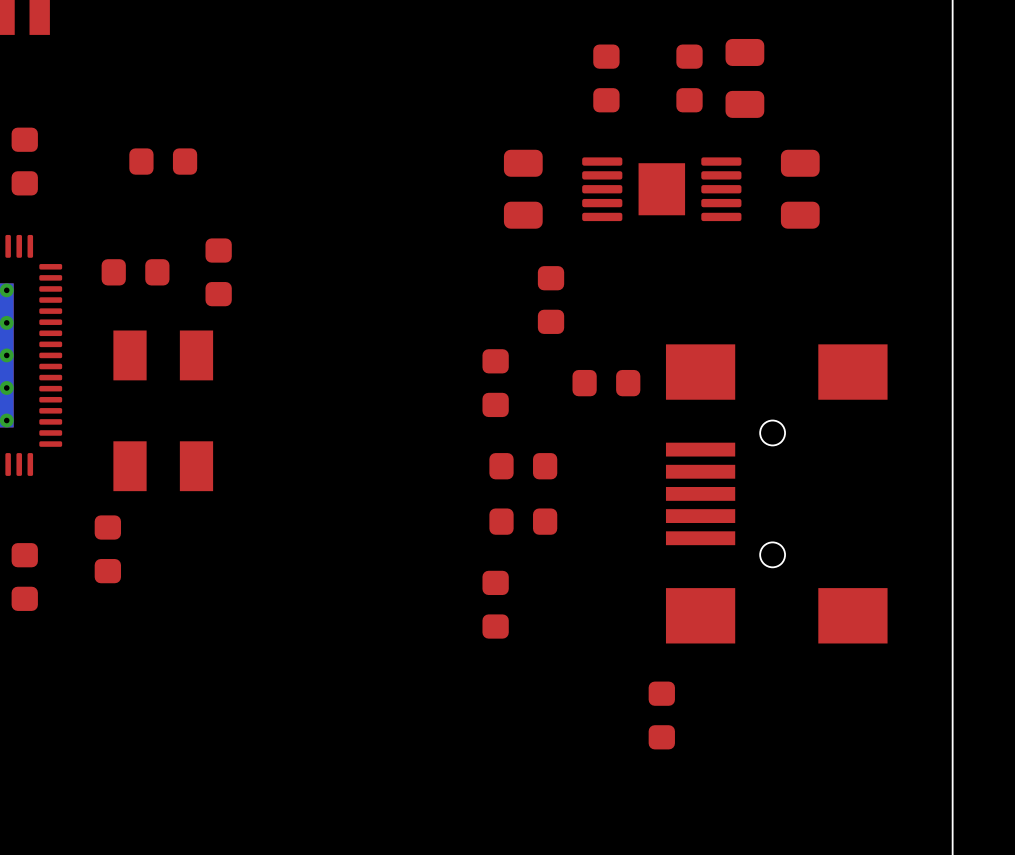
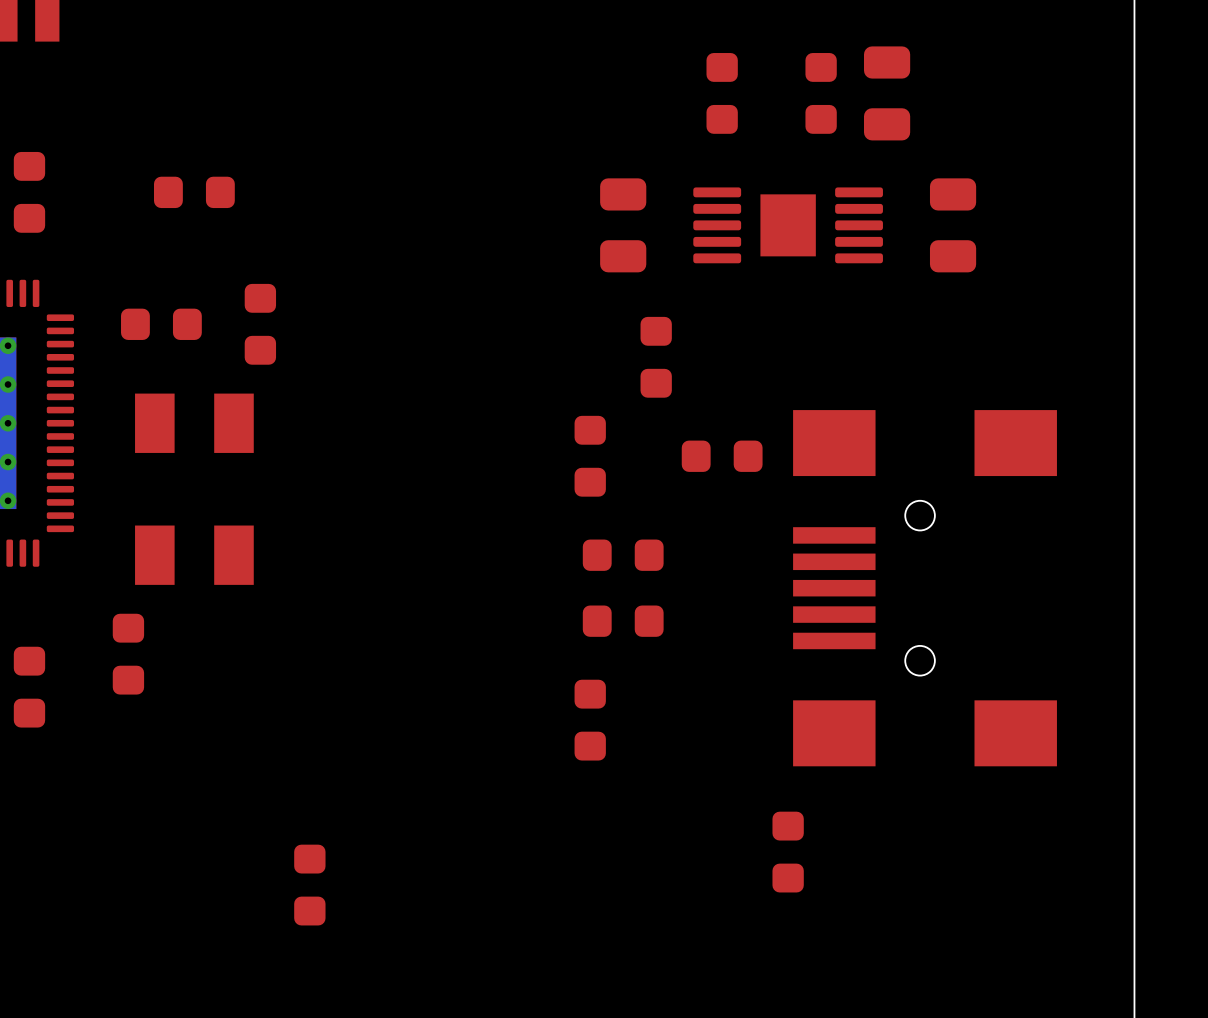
part: none -> (309, 885)

